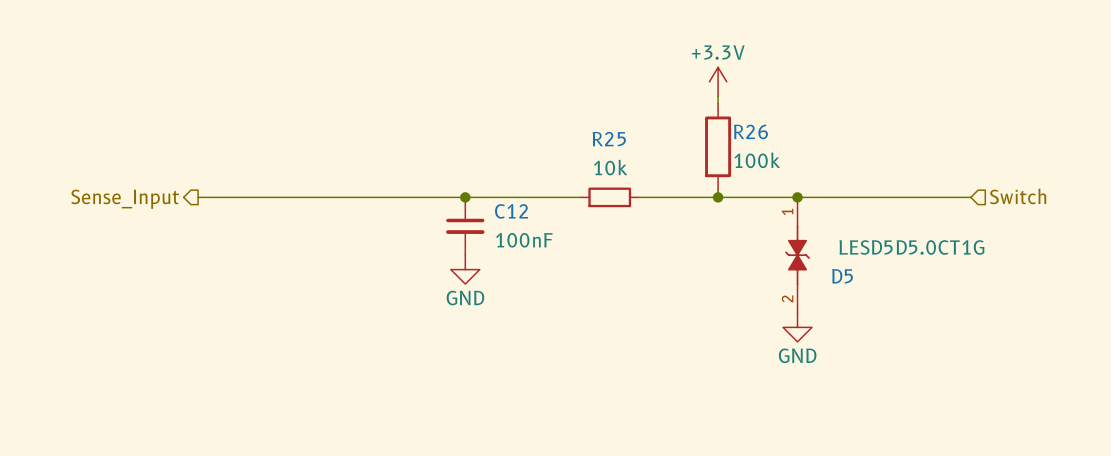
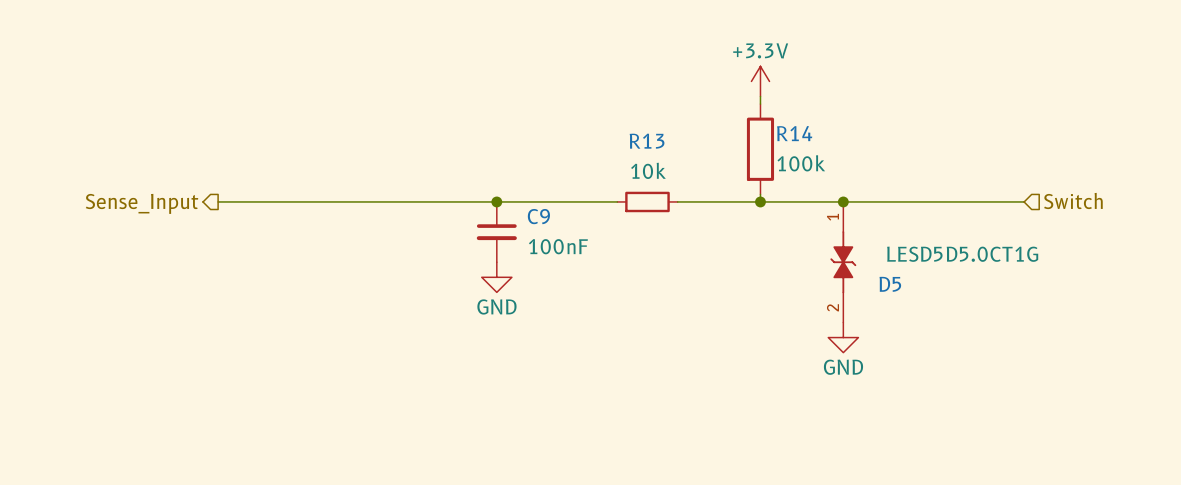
R26 name: R26 (750, 131) -> R14 (794, 133)
R25 name: R25 (609, 139) -> R13 (647, 141)
C12 name: C12 (511, 211) -> C9 (538, 216)

